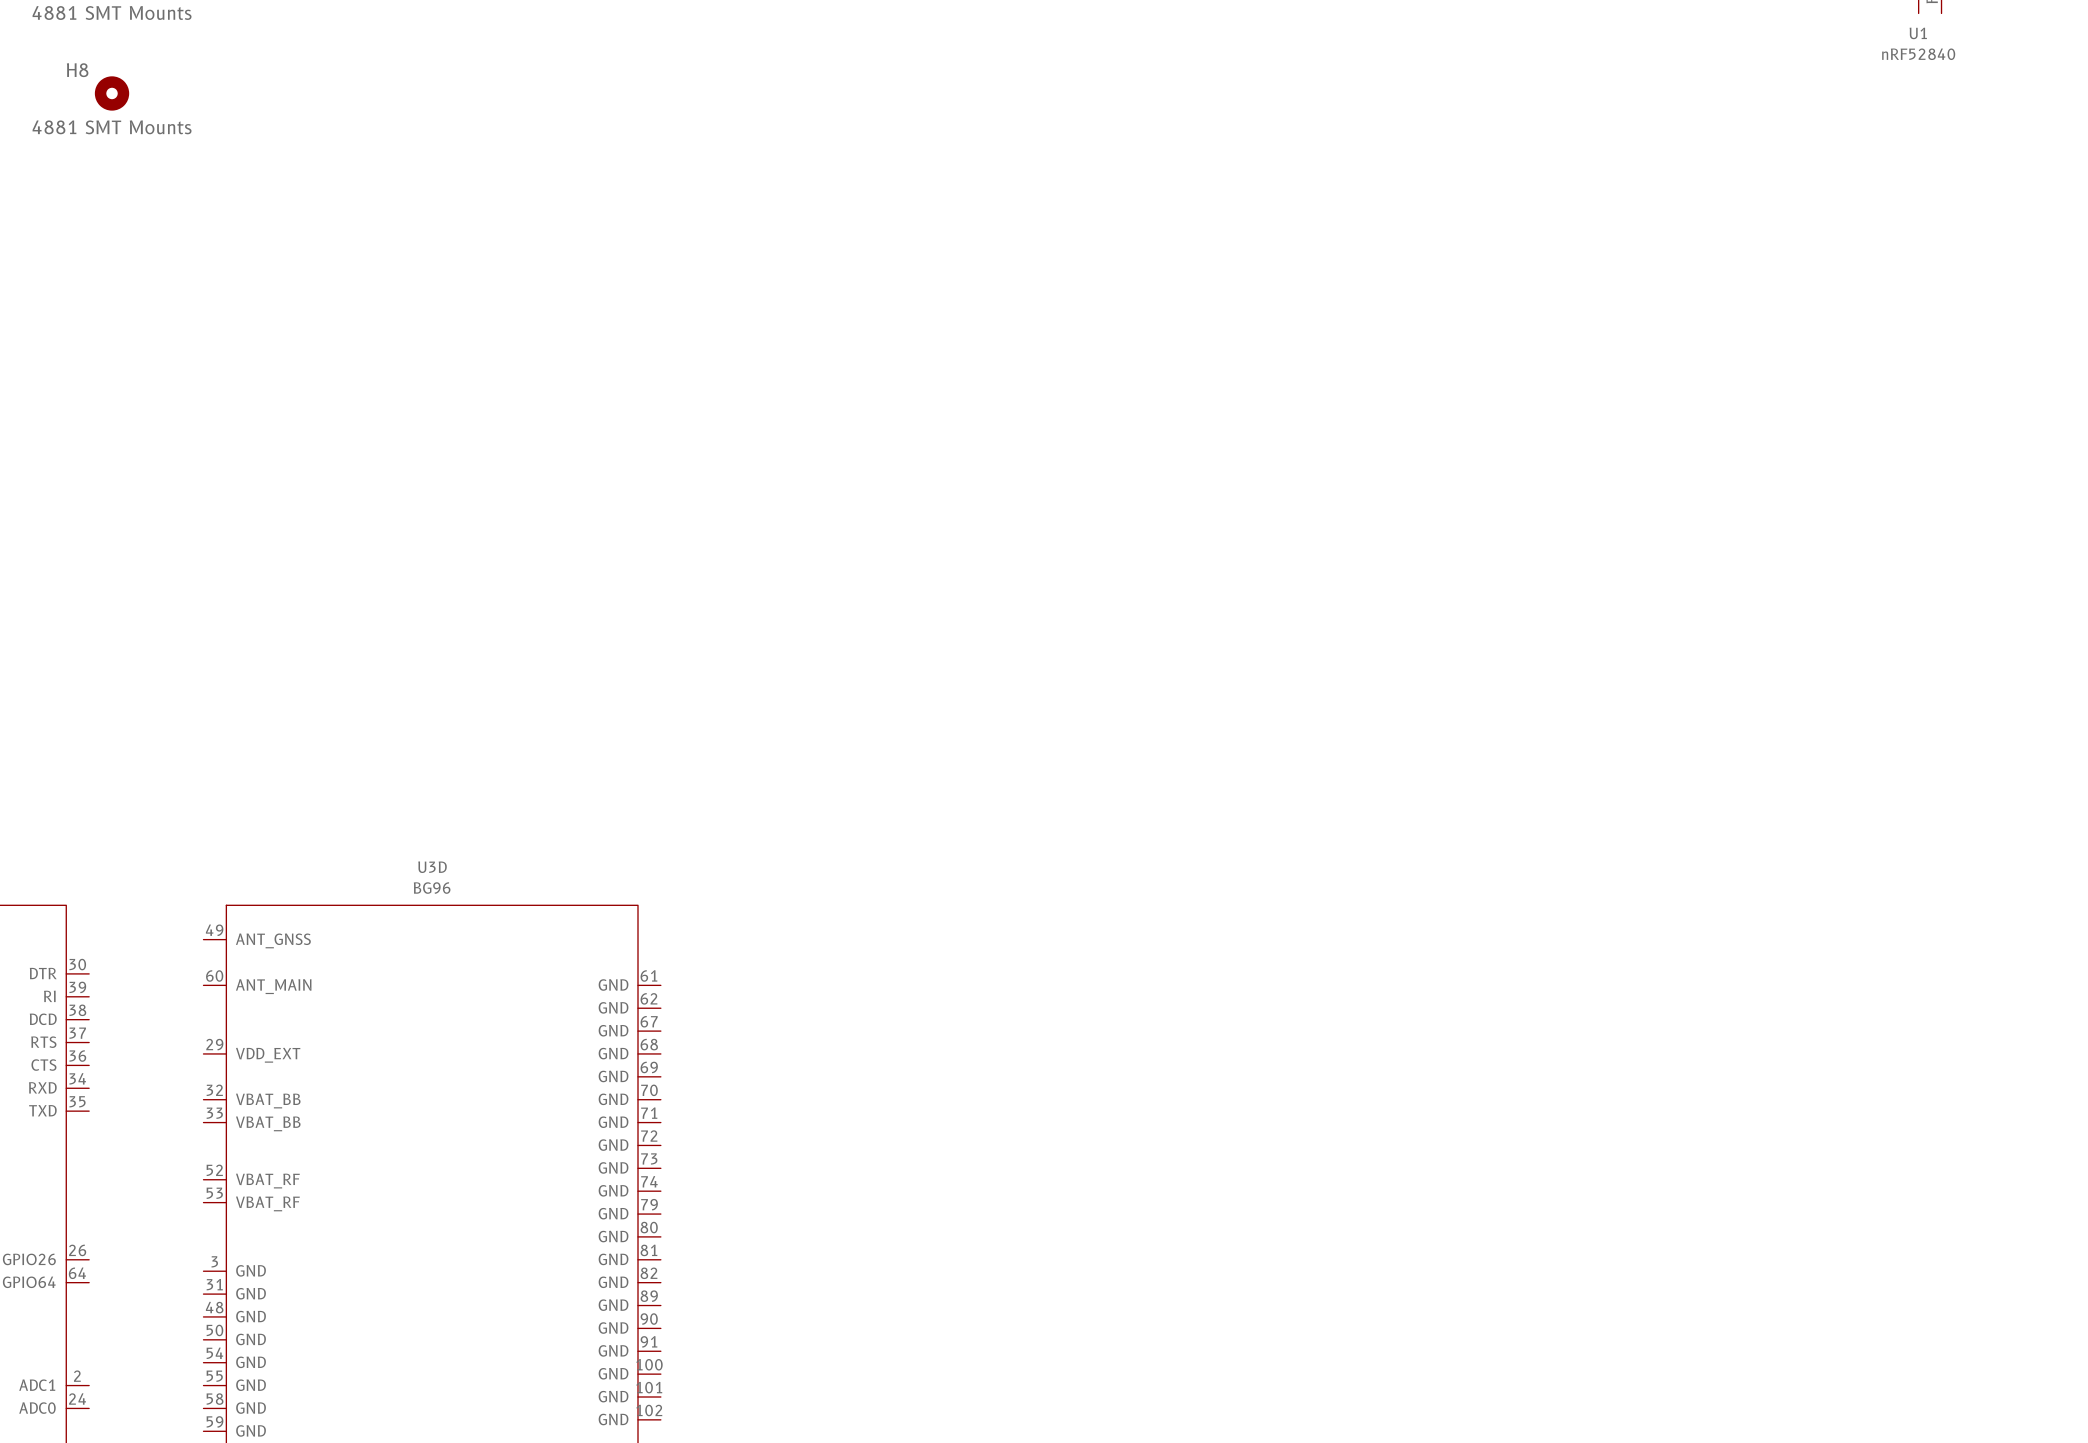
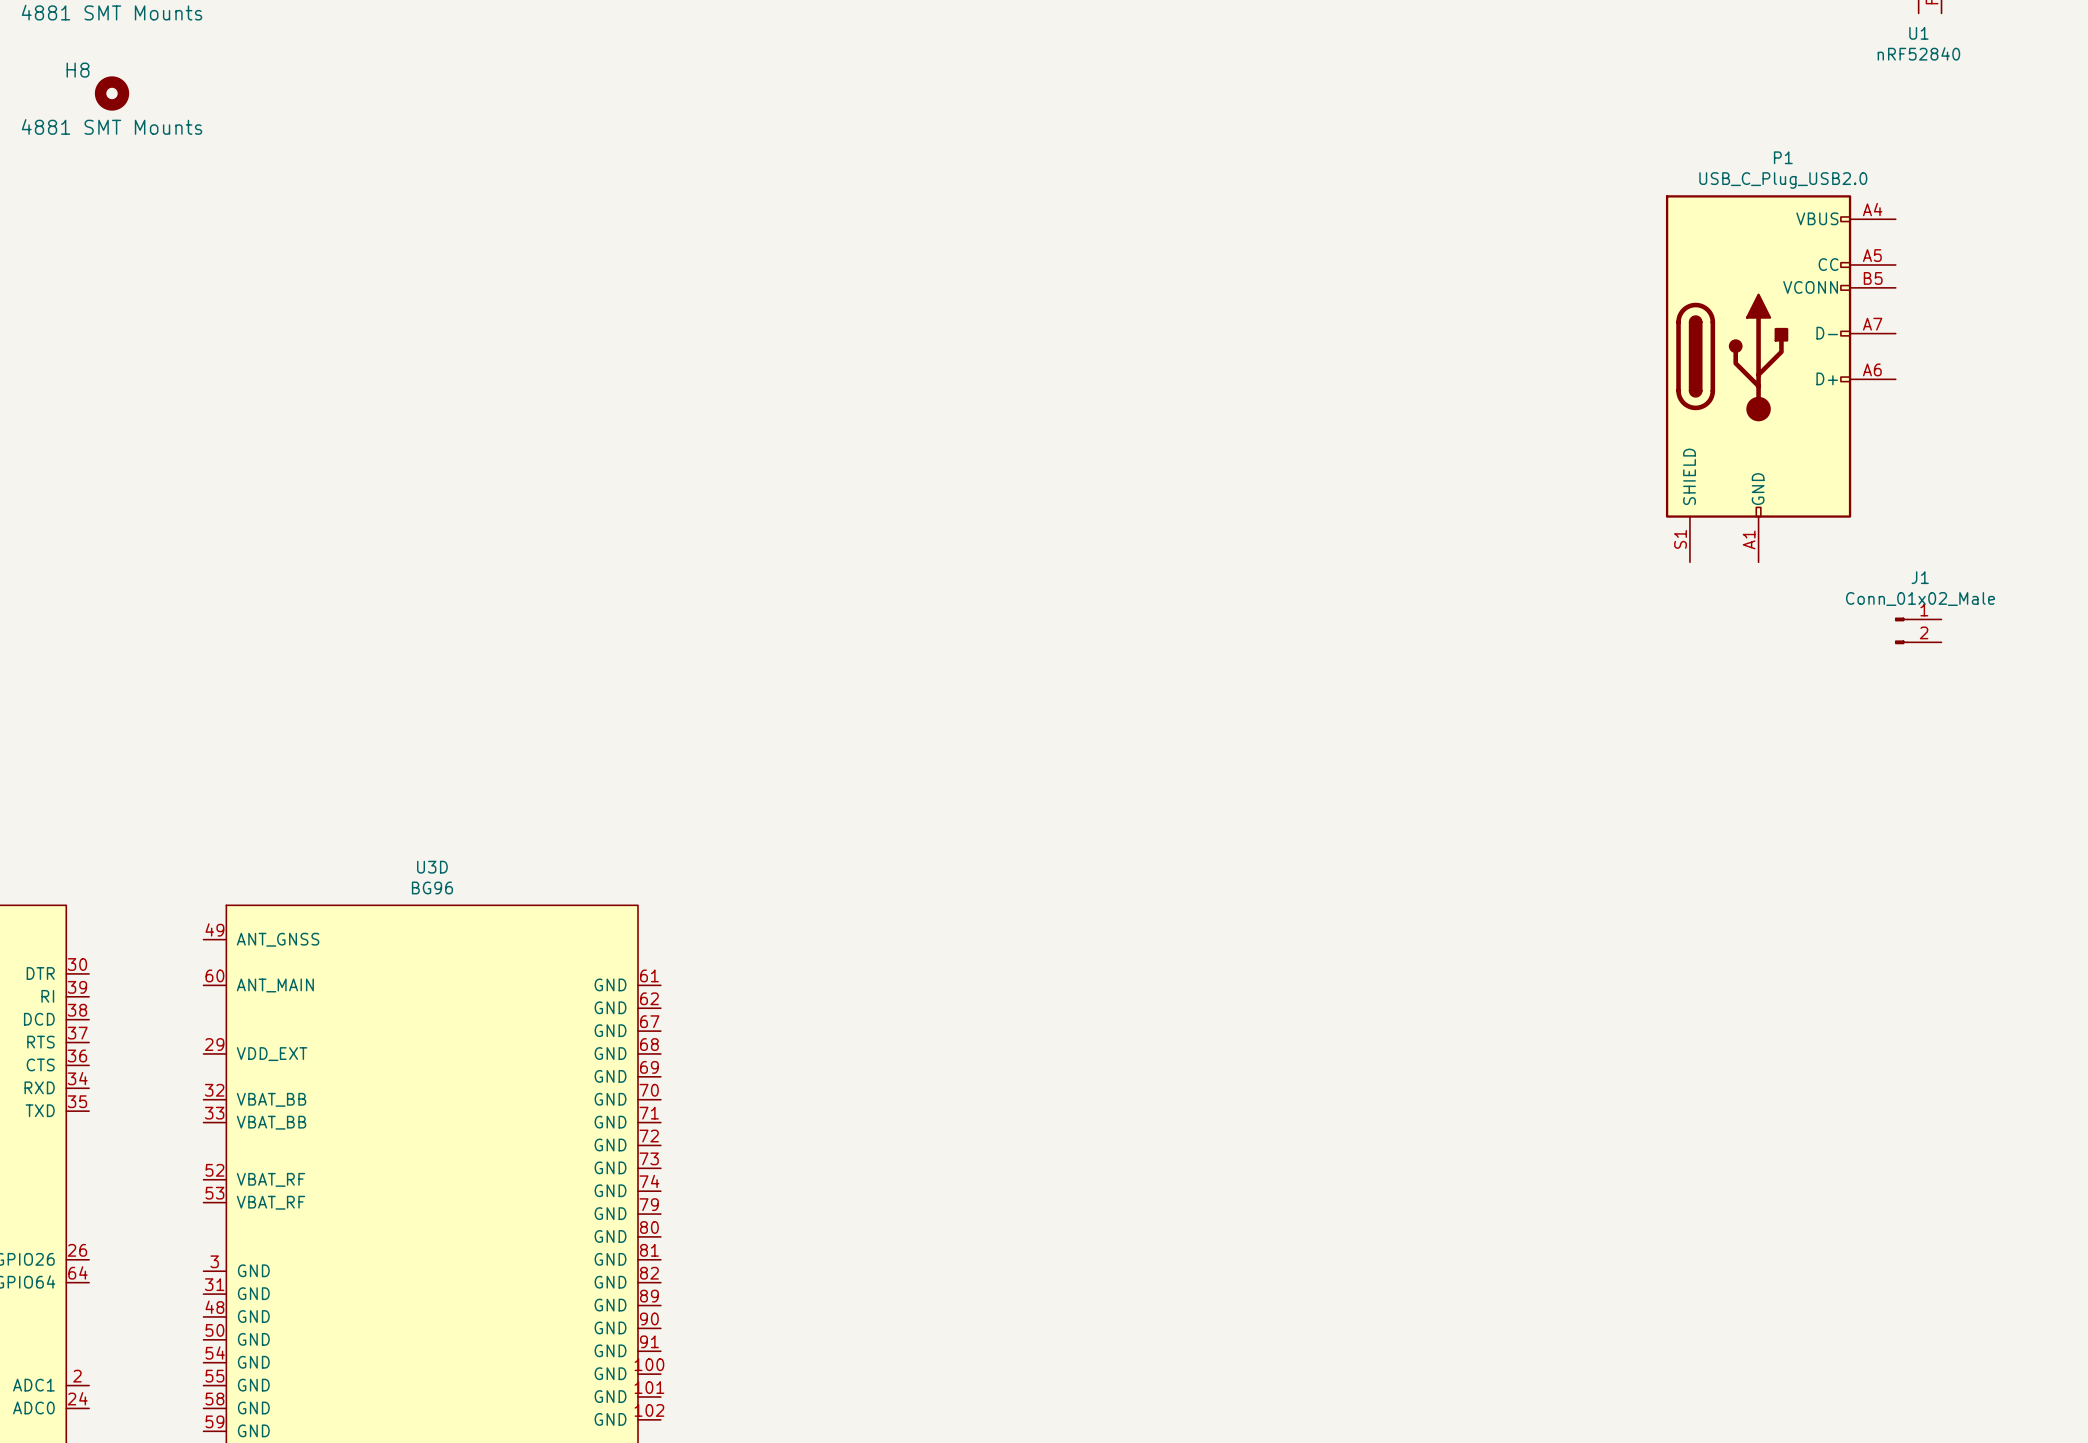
P1: none -> USB_C_Plug_USB2.0 (1780, 378)
J1: none -> Conn_01x02_Male (1918, 630)

